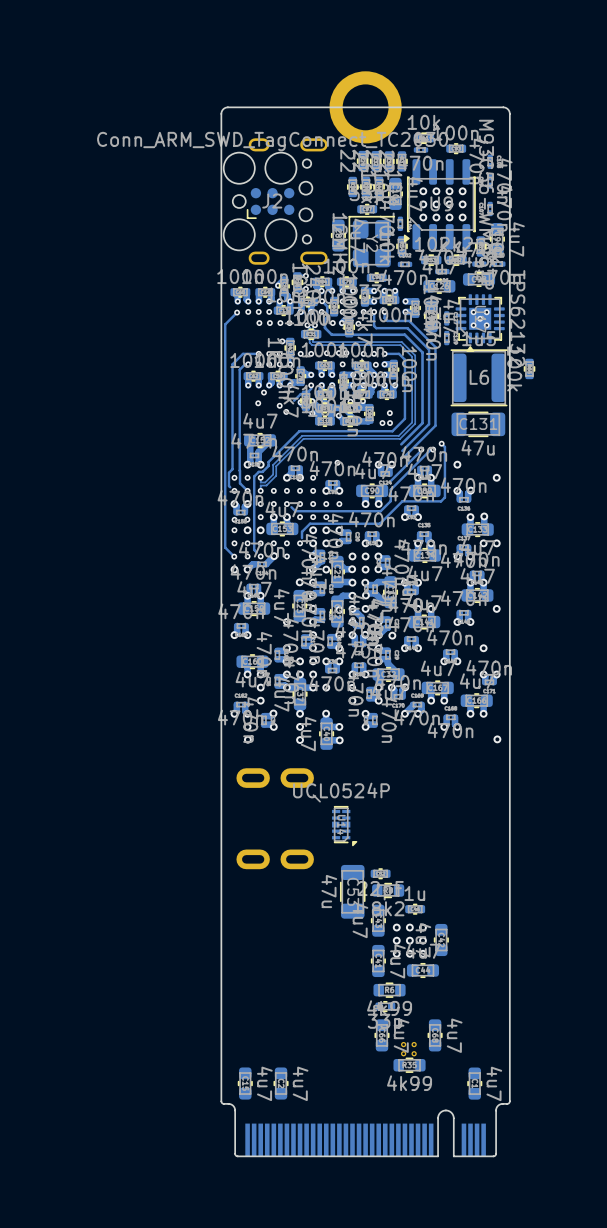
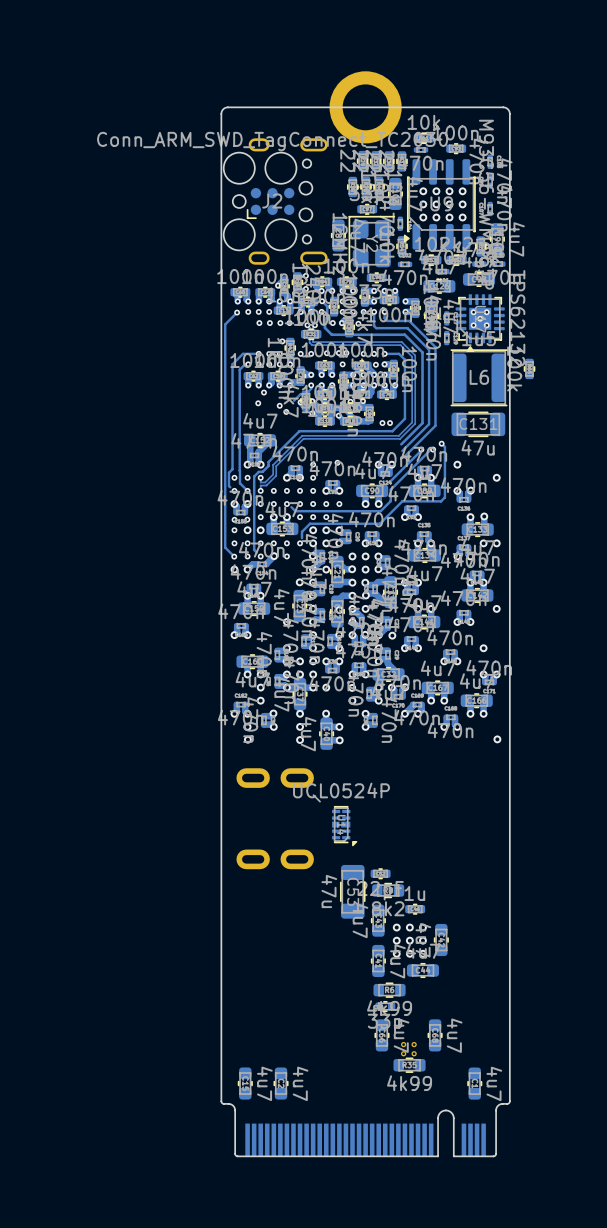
via: (389, 413) -> none
via: none -> (313, 464)

